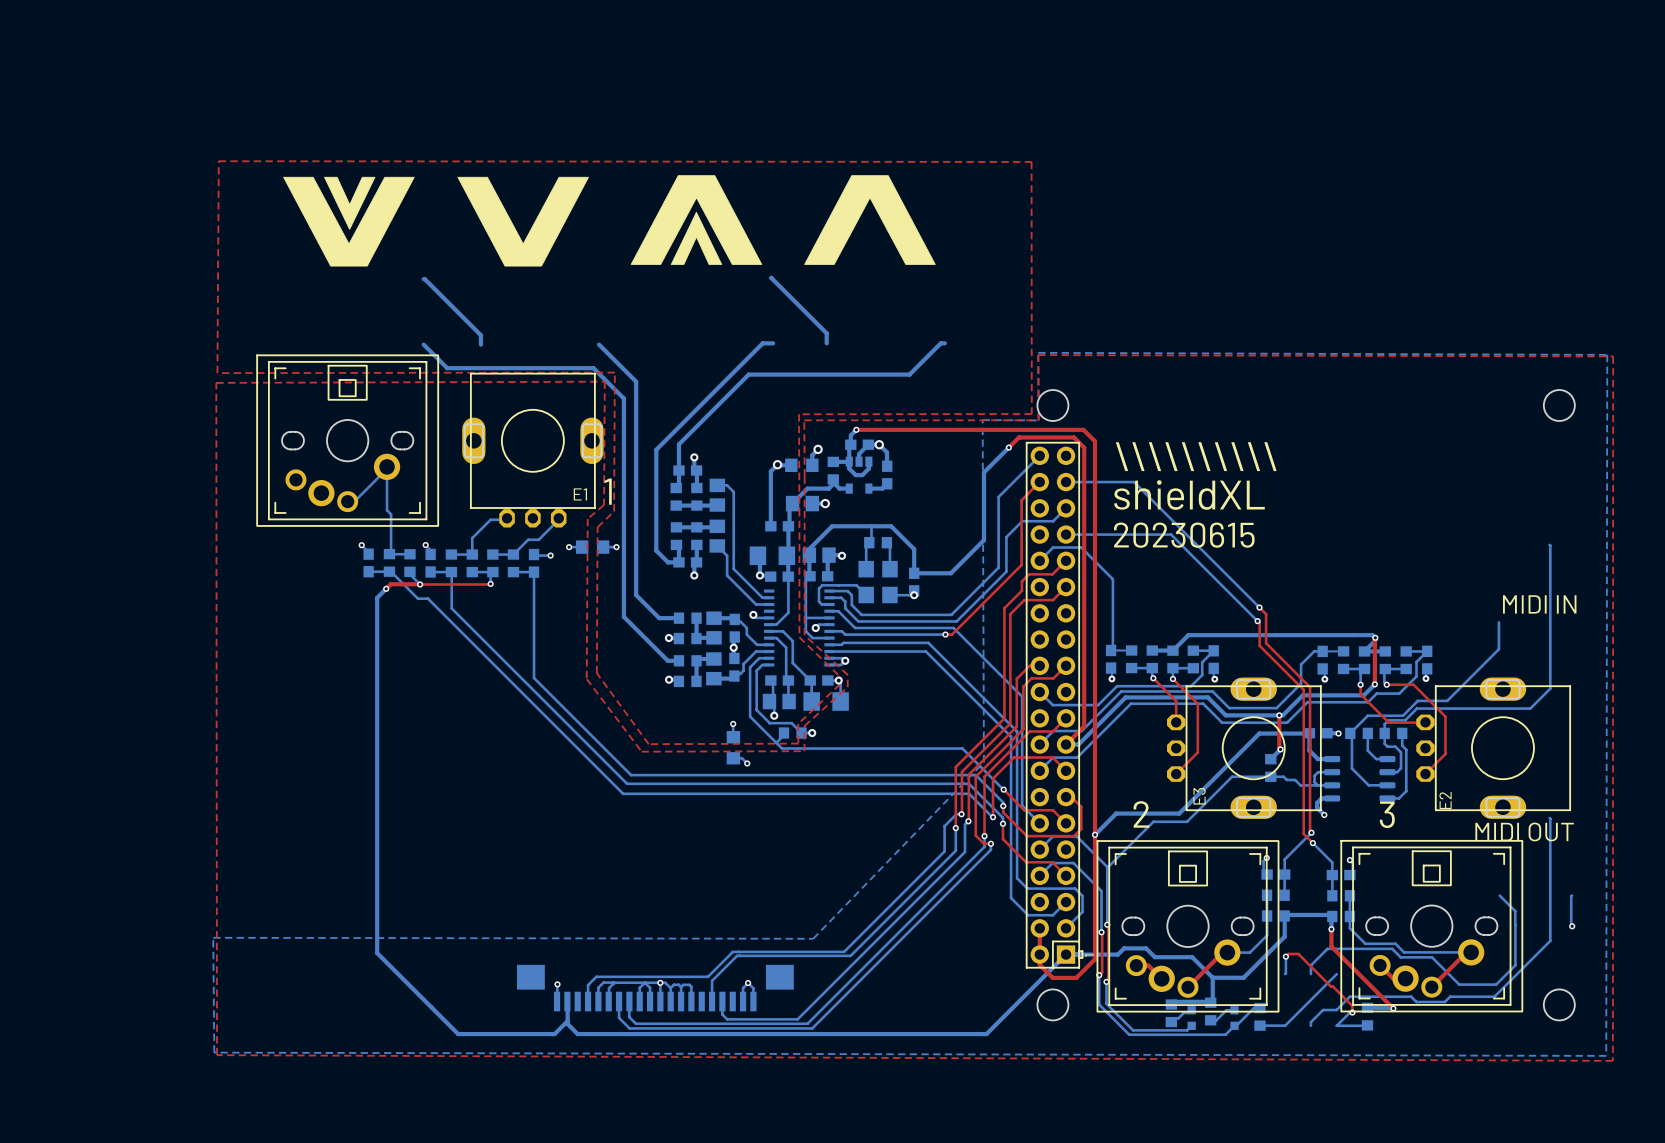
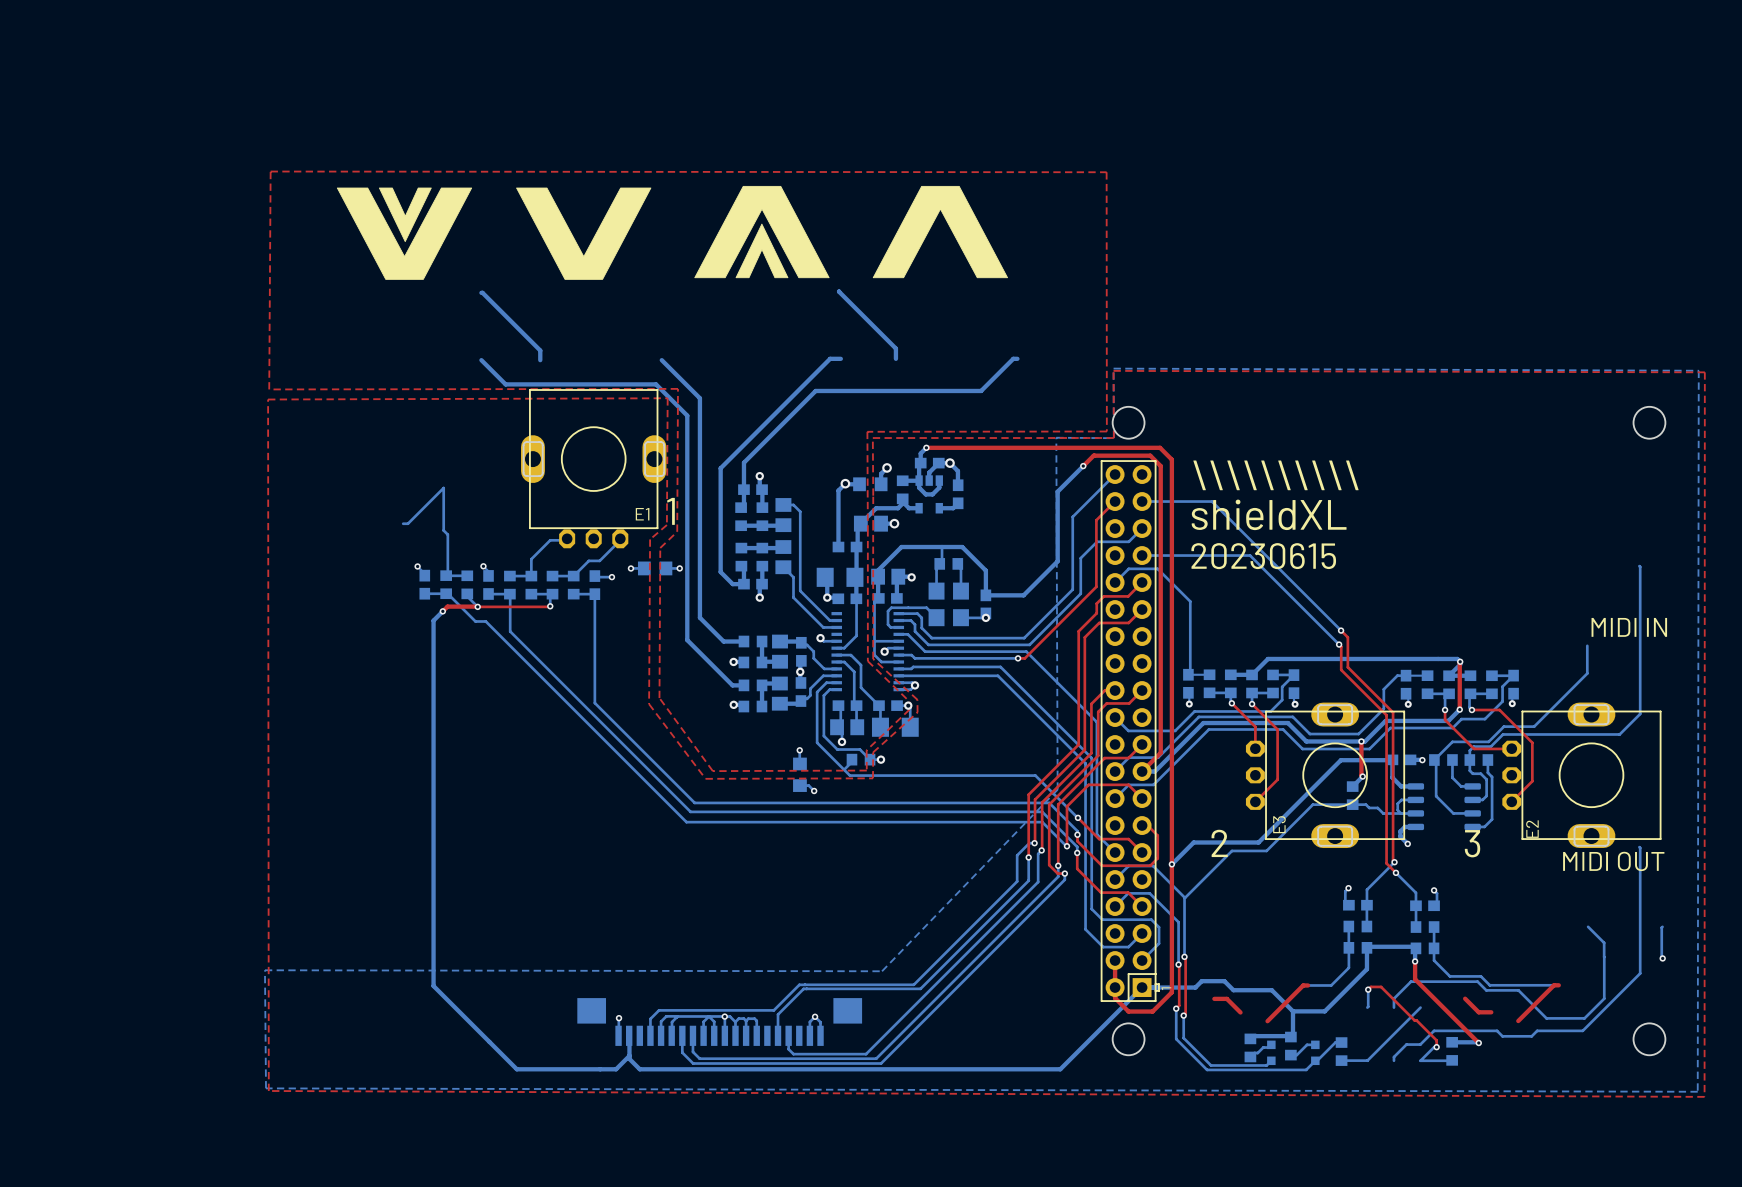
part: (347, 440) -> none
part: (1188, 926) -> none
part: (1431, 926) -> none

